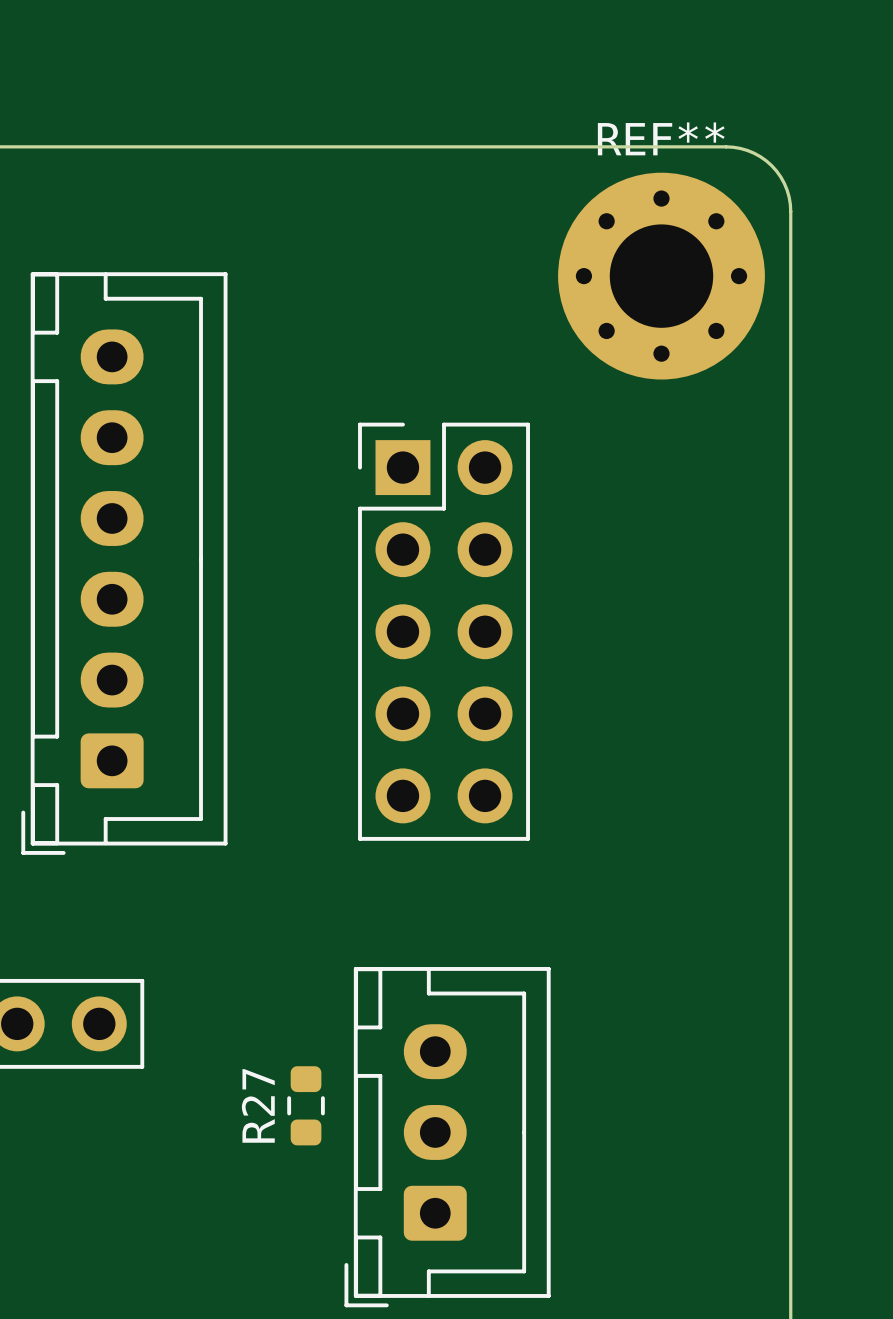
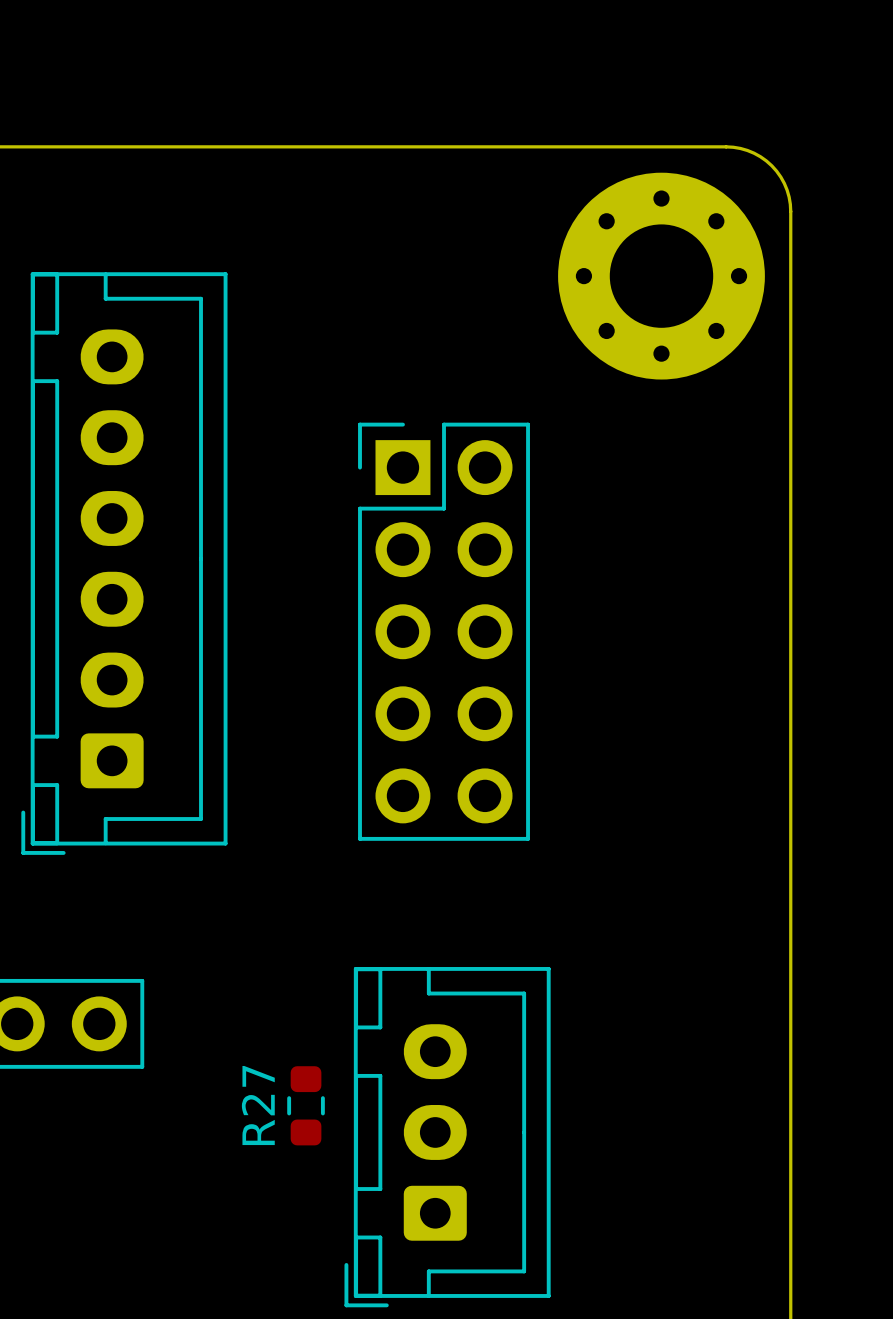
REF** name: REF** (661, 138) -> none

